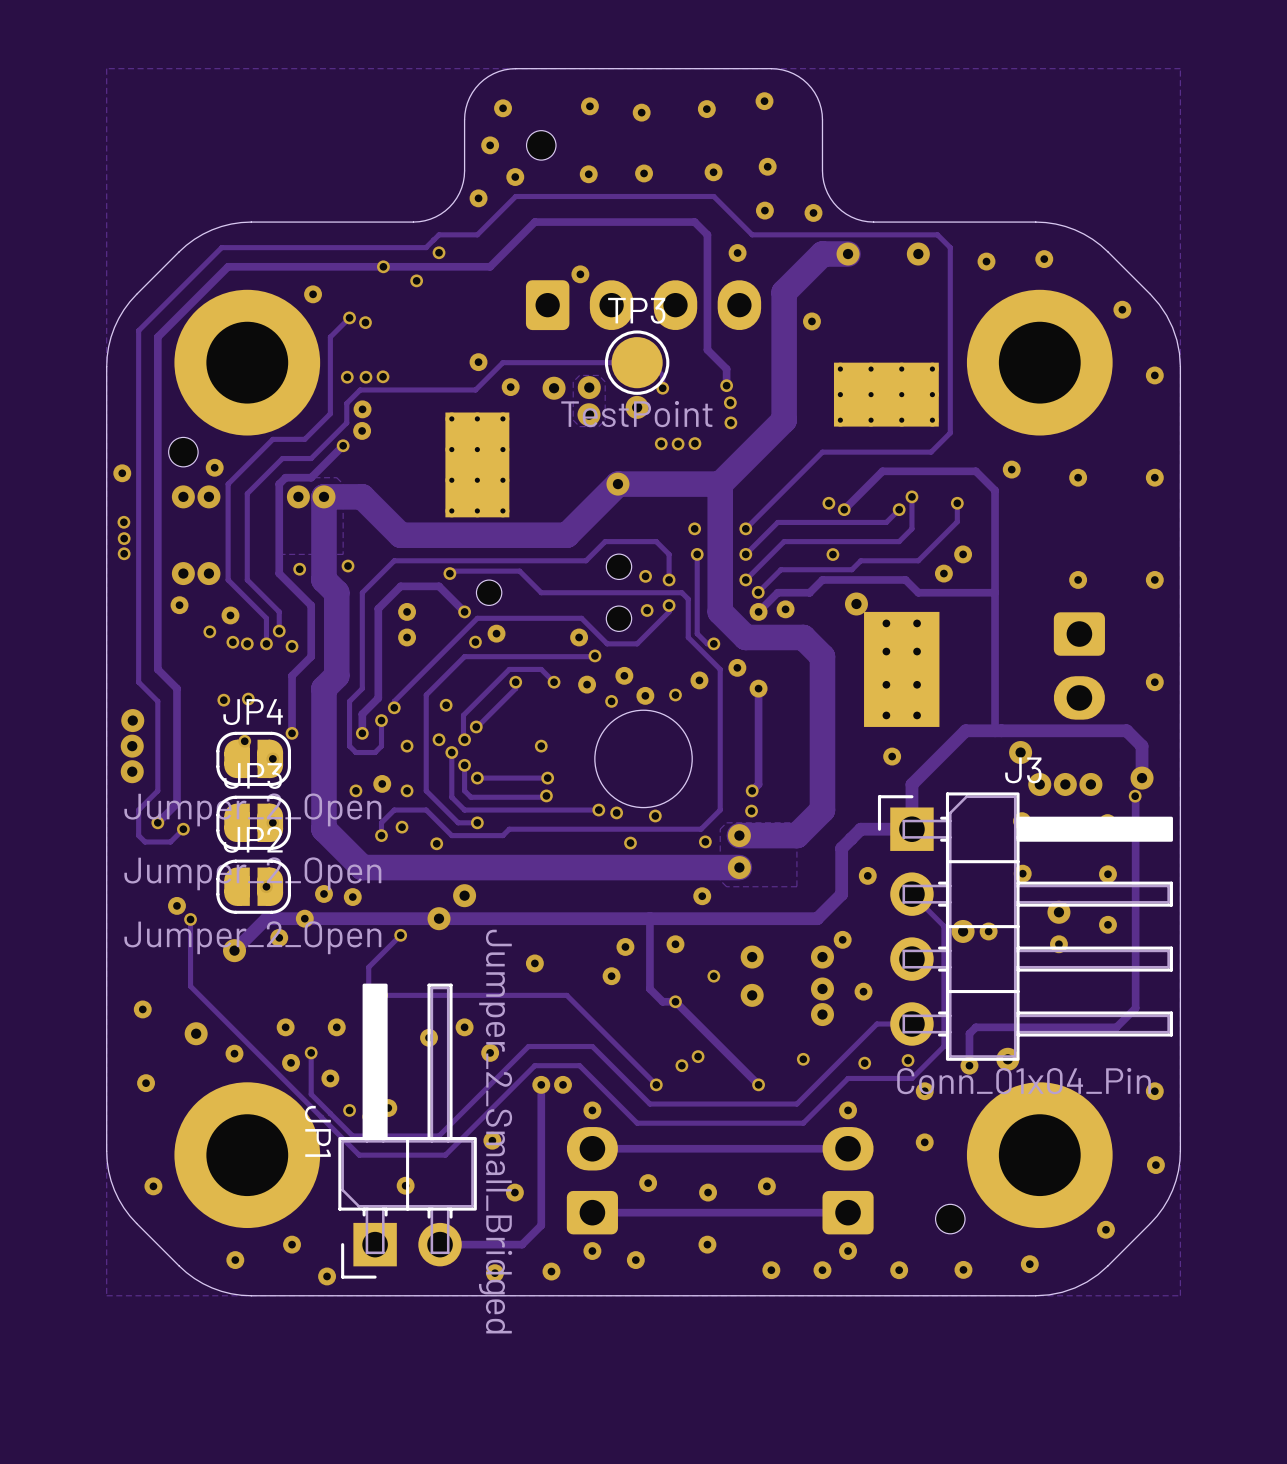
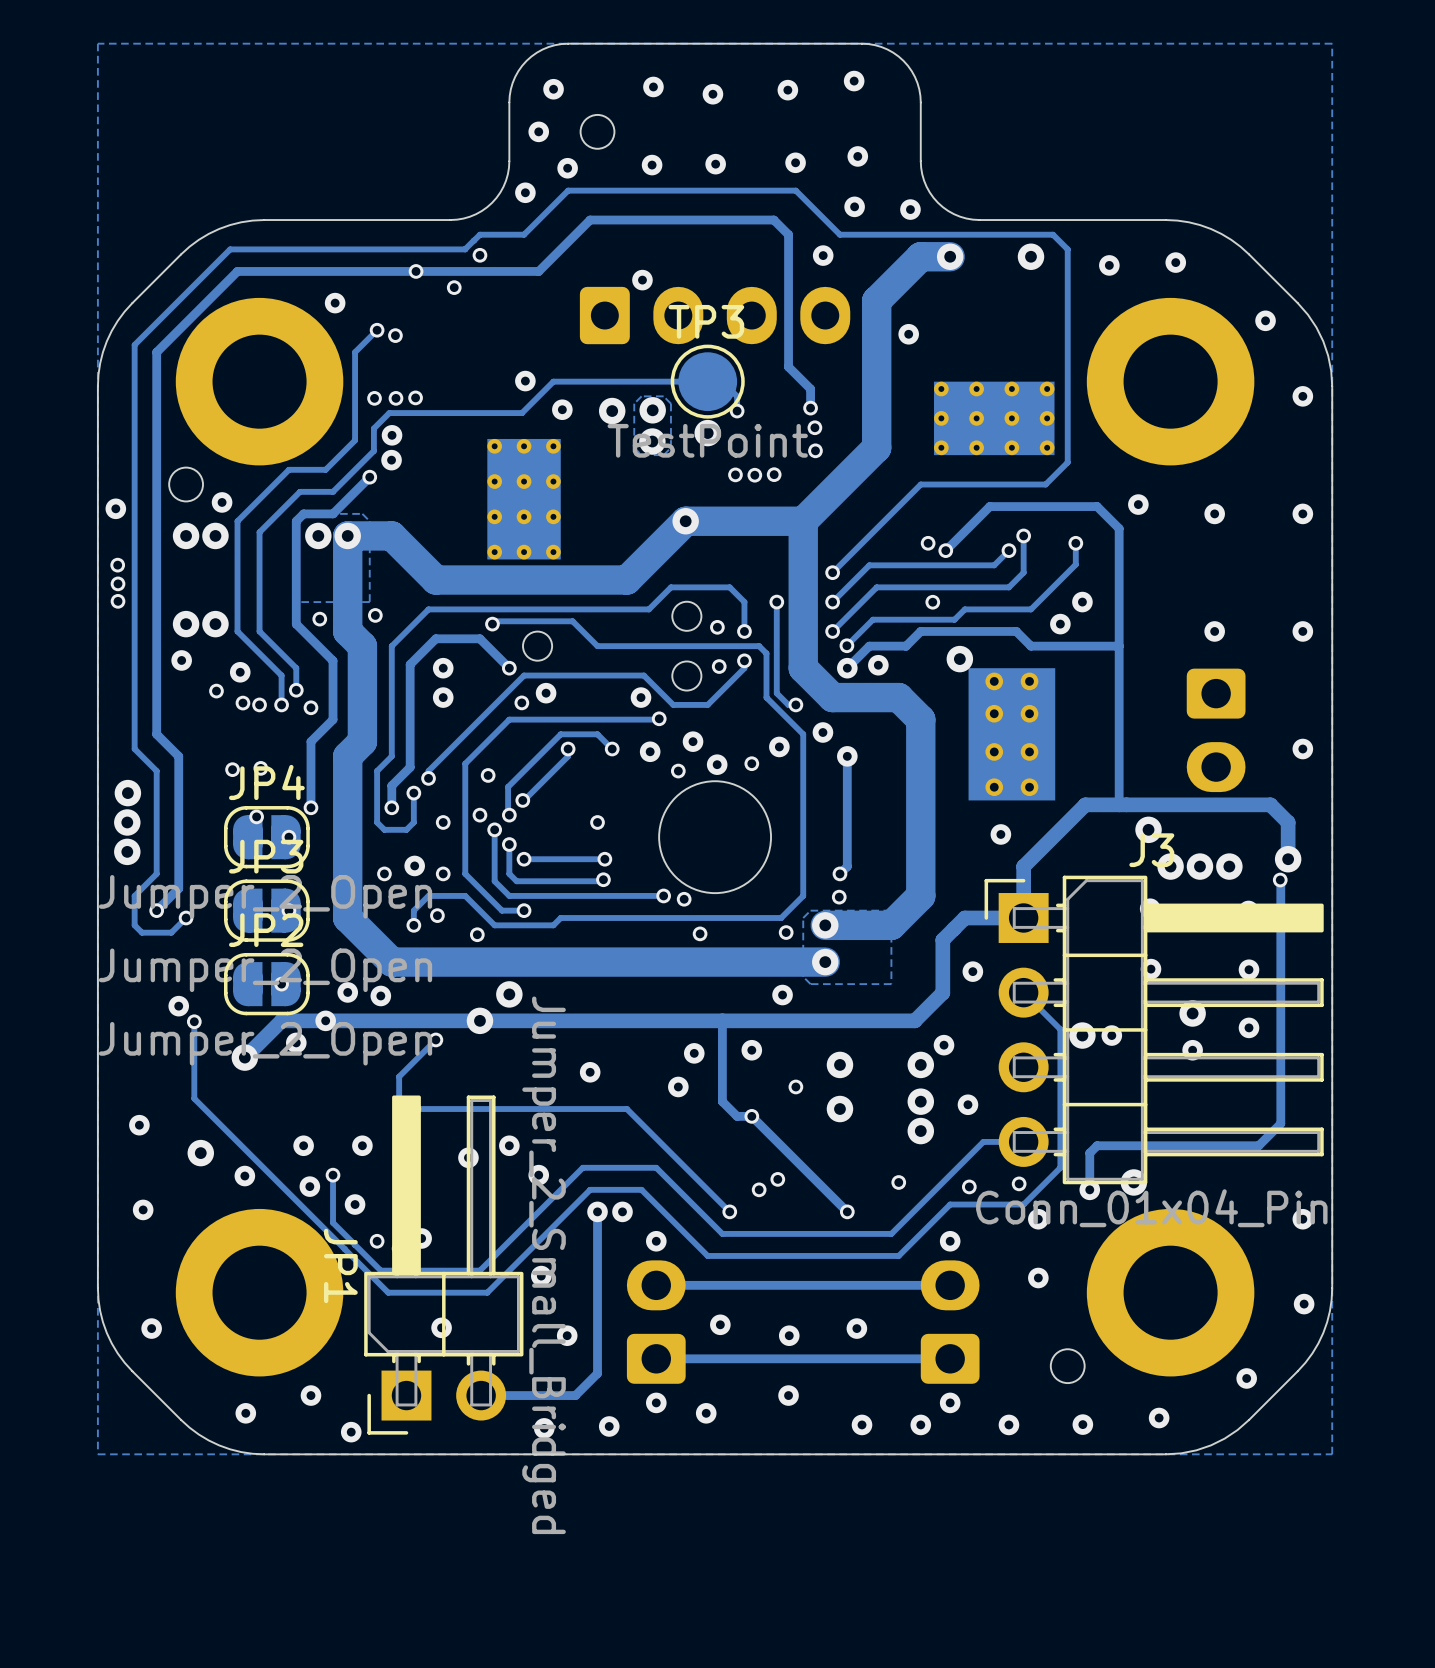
via: (694, 528) -> none
via: (655, 815) -> none

